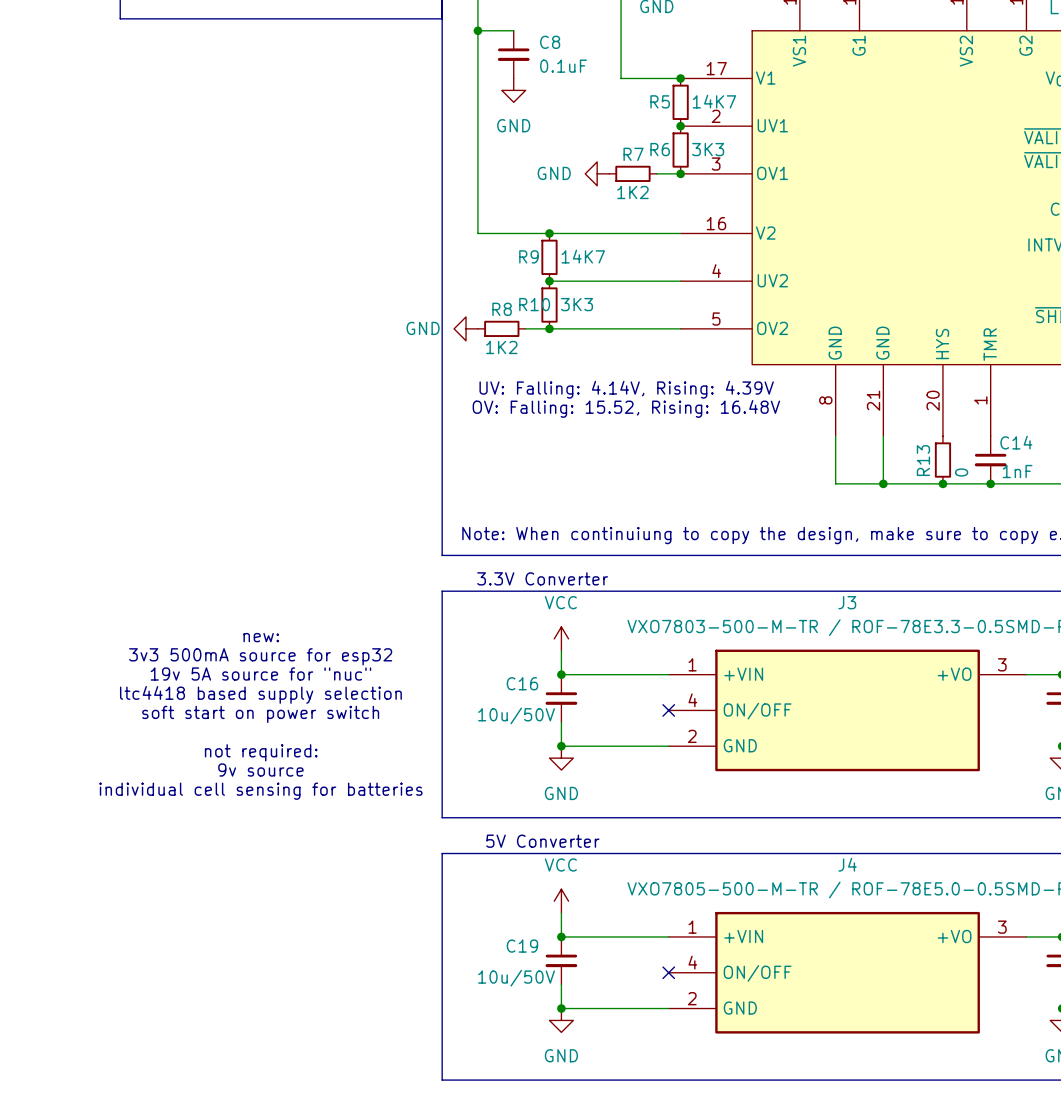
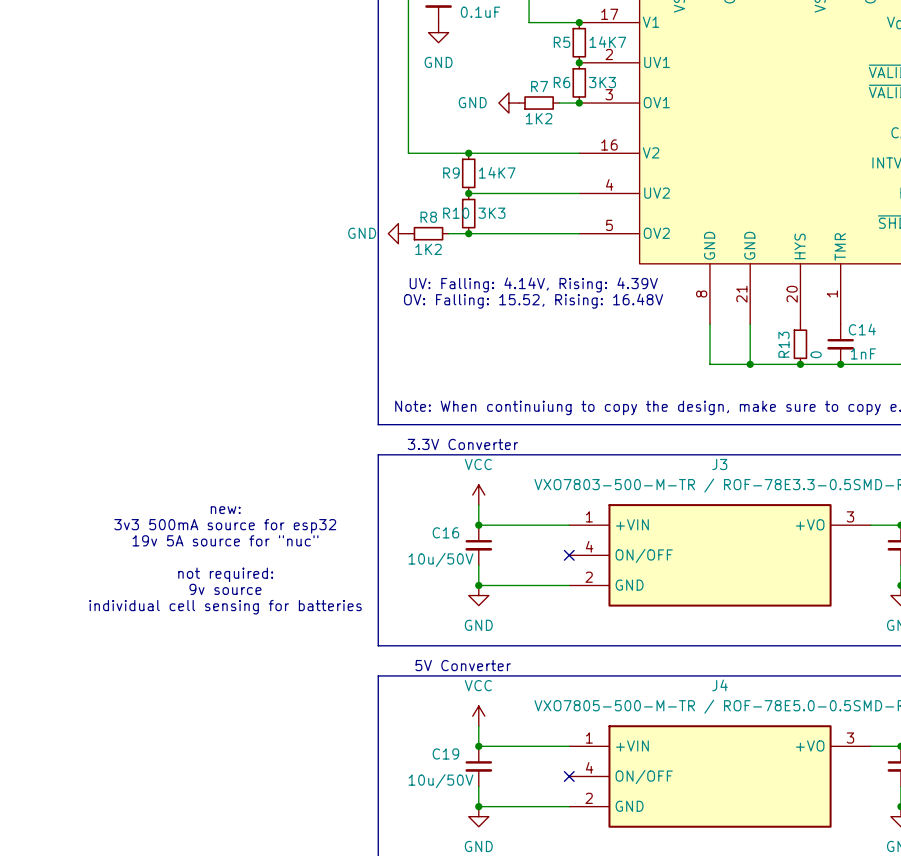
text: new: (261, 637) -> none
text: 3v3 500mA source for esp32 (260, 656) -> new: (225, 510)
text: 19v 5A source for "nuc" (260, 674) -> 3v3 500mA source for esp32 (225, 526)
text: ltc4418 based supply selection (260, 694) -> 19v 5A source for "nuc" (225, 540)
text: soft start on power switch (260, 714) -> none
text: none -> not required: (225, 574)
text: not required: (261, 752) -> 9v source (225, 589)
text: 9v source (260, 770) -> individual cell sensing for batteries (225, 607)
text: individual cell sensing for batteries (260, 791) -> none

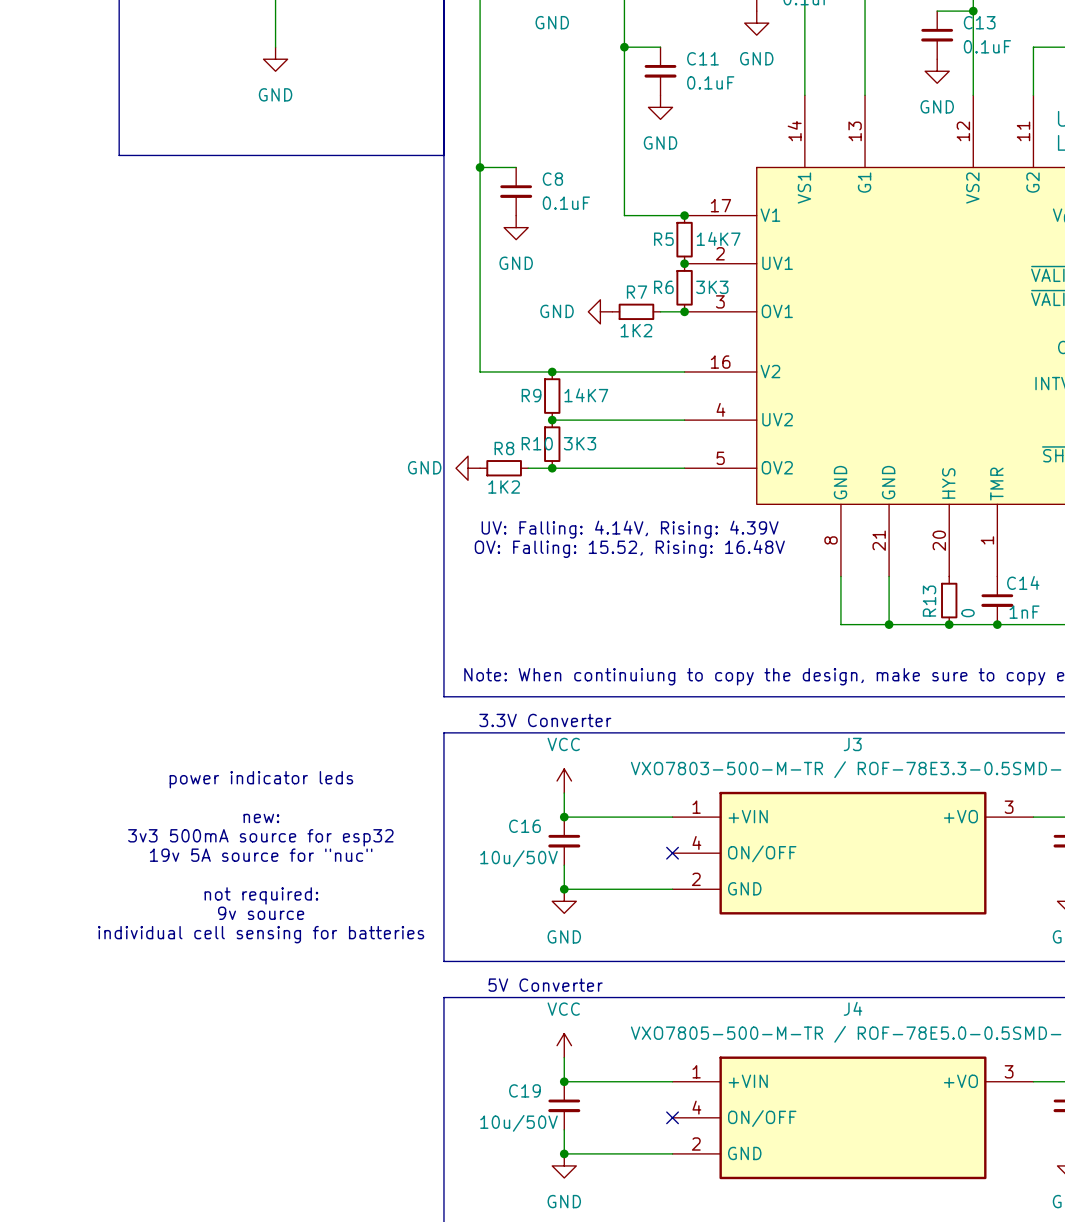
text: none -> power indicator leds (261, 779)
text: new: (225, 510) -> none
text: 3v3 500mA source for esp32 (225, 526) -> new: (261, 818)
text: 19v 5A source for "nuc" (225, 540) -> 3v3 500mA source for esp32 (260, 837)
text: none -> 19v 5A source for "nuc" (261, 855)
text: not required: (225, 574) -> none
text: 9v source (225, 589) -> not required: (261, 895)
text: individual cell sensing for batteries (225, 607) -> 9v source (261, 913)
text: none -> individual cell sensing for batteries (261, 934)

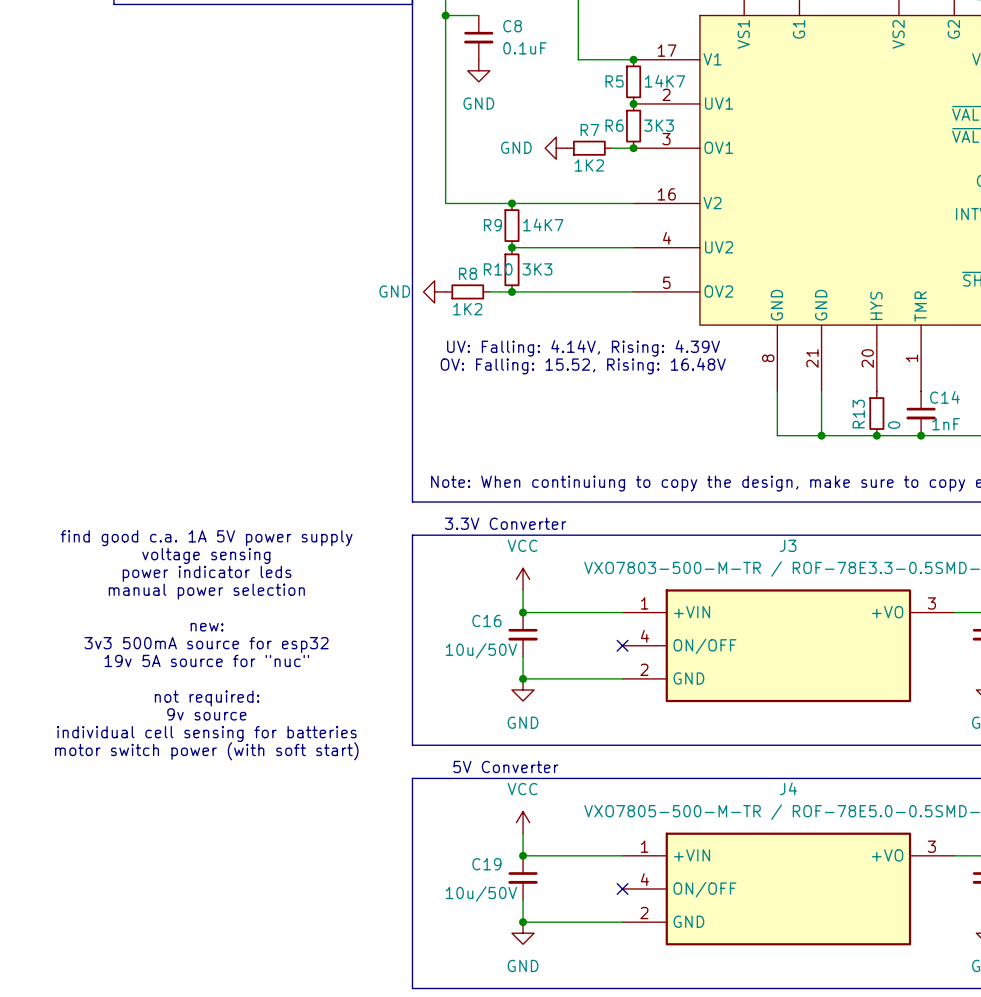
text: none -> find good c.a. 1A 5V power supply (206, 538)
text: none -> voltage sensing (206, 555)
text position: power indicator leds (261, 779) -> power indicator leds (207, 573)
text: none -> manual power selection (206, 591)
text position: new: (261, 818) -> new: (207, 627)
text position: 3v3 500mA source for esp32 (260, 837) -> 3v3 500mA source for esp32 (206, 645)
text position: 19v 5A source for "nuc" (261, 855) -> 19v 5A source for "nuc" (206, 660)
text position: not required: (261, 895) -> not required: (207, 698)
text position: 9v source (261, 913) -> 9v source (206, 714)
text position: individual cell sensing for batteries (261, 934) -> individual cell sensing for batteries (206, 734)
text: none -> motor switch power (with soft start) (206, 751)

